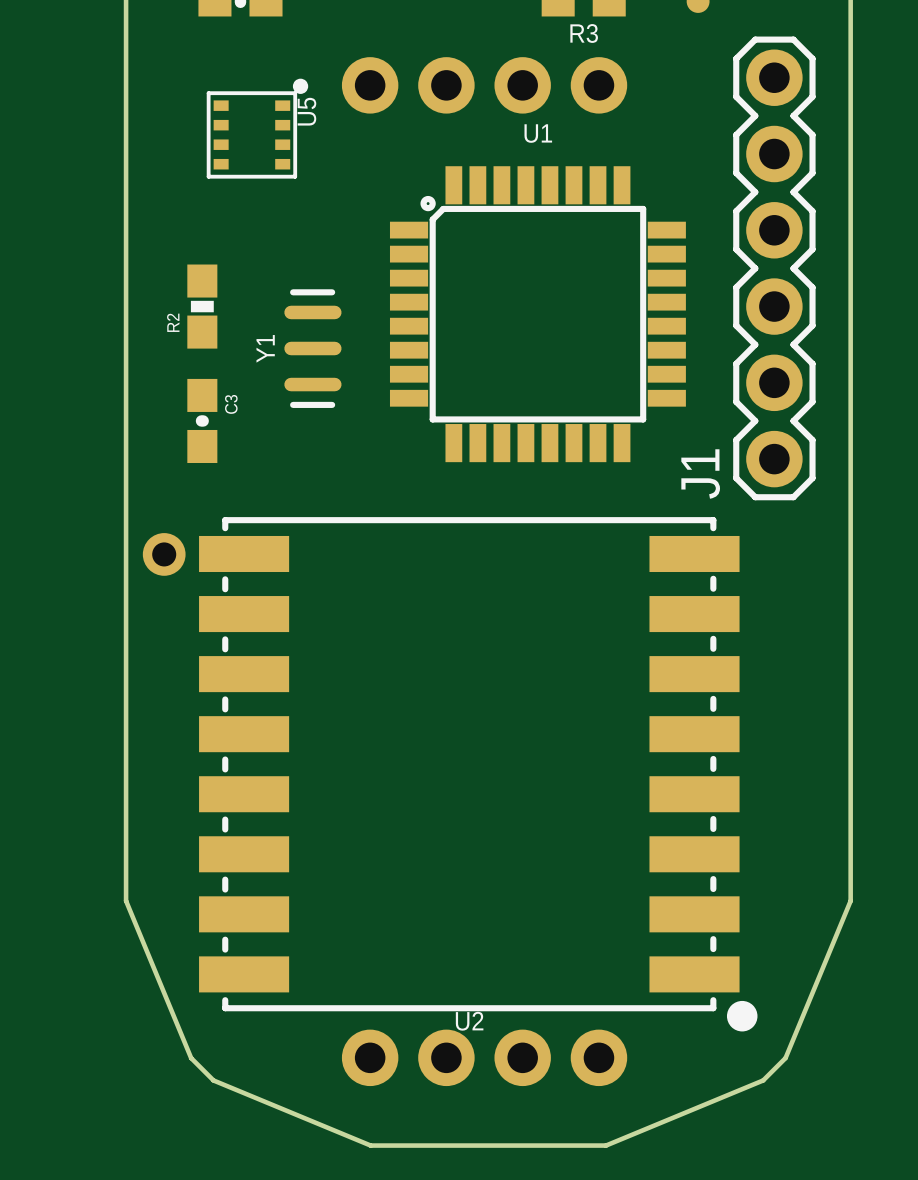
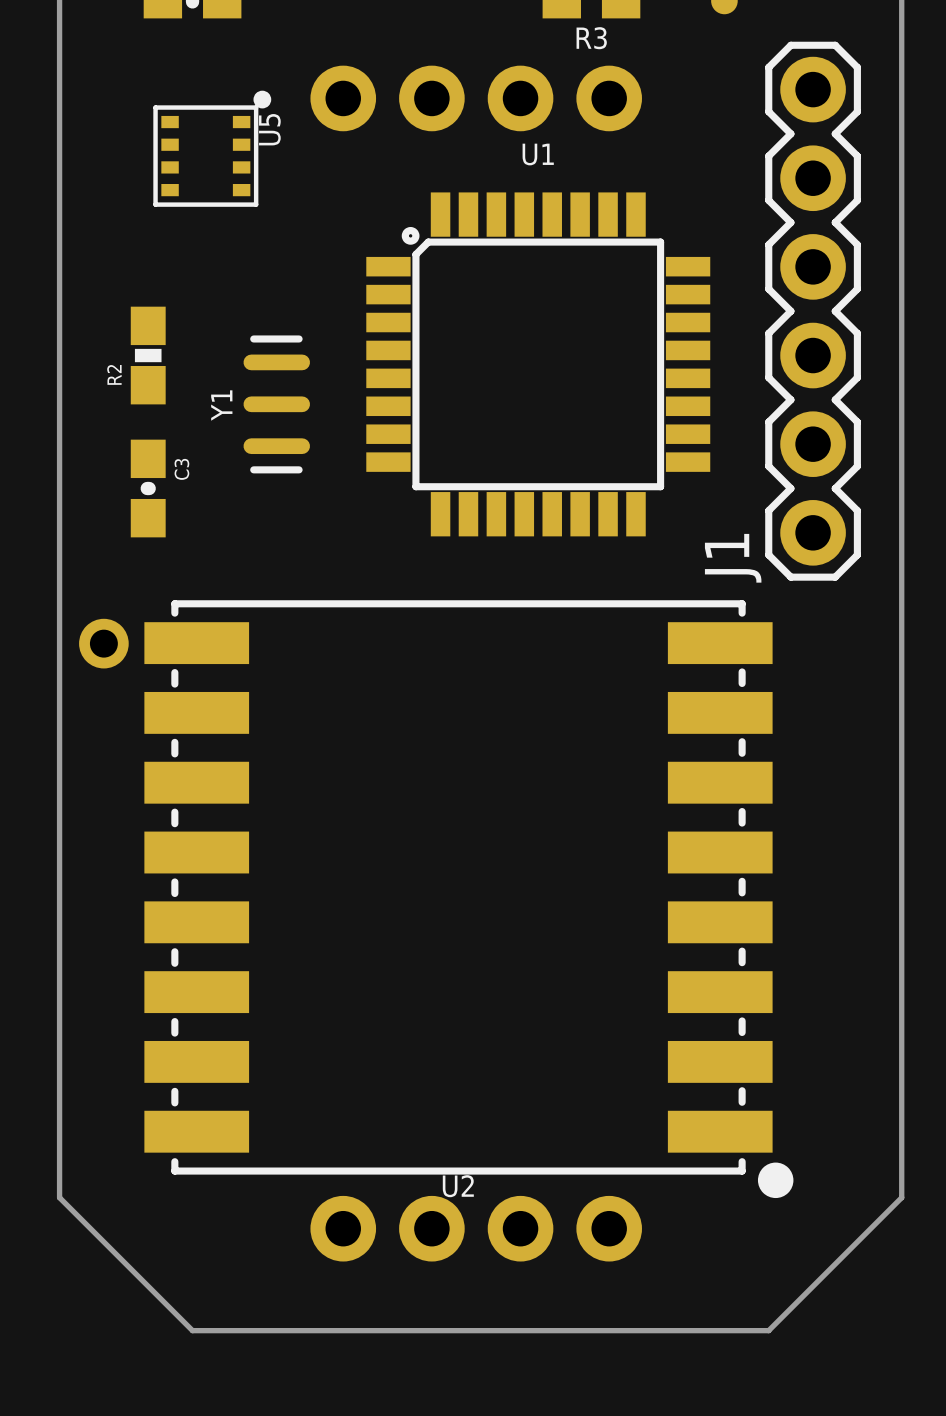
board edge: (126, 900) (191, 1058) (213, 1080) (370, 1145) -> (59, 1046) (59, 1197) (192, 1330) (343, 1330)
board edge: (850, 900) (785, 1058) (763, 1080) (606, 1145) -> (901, 1046) (901, 1197) (768, 1330) (617, 1330)

